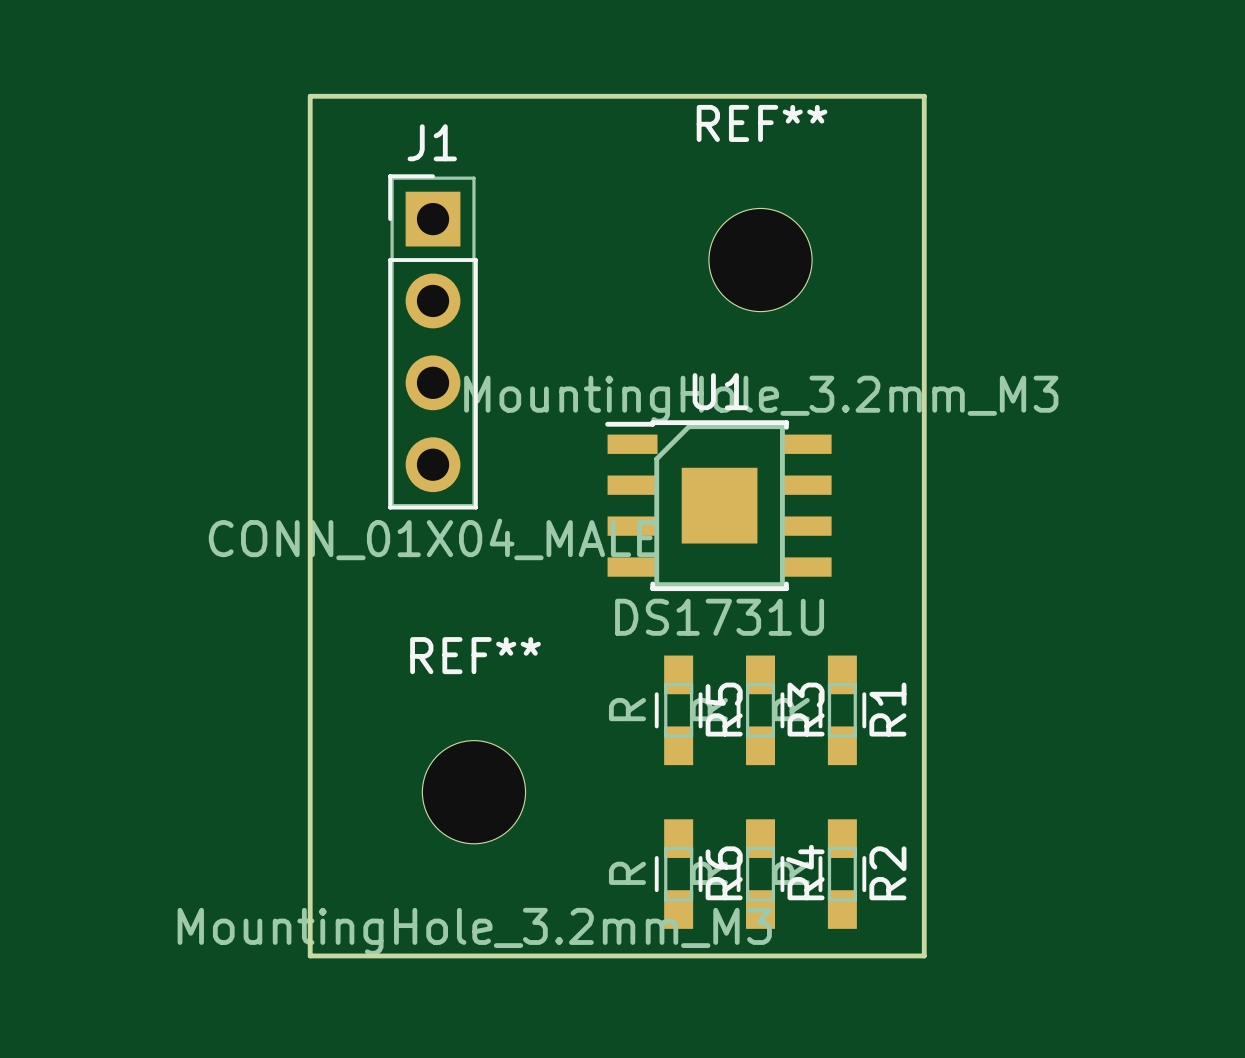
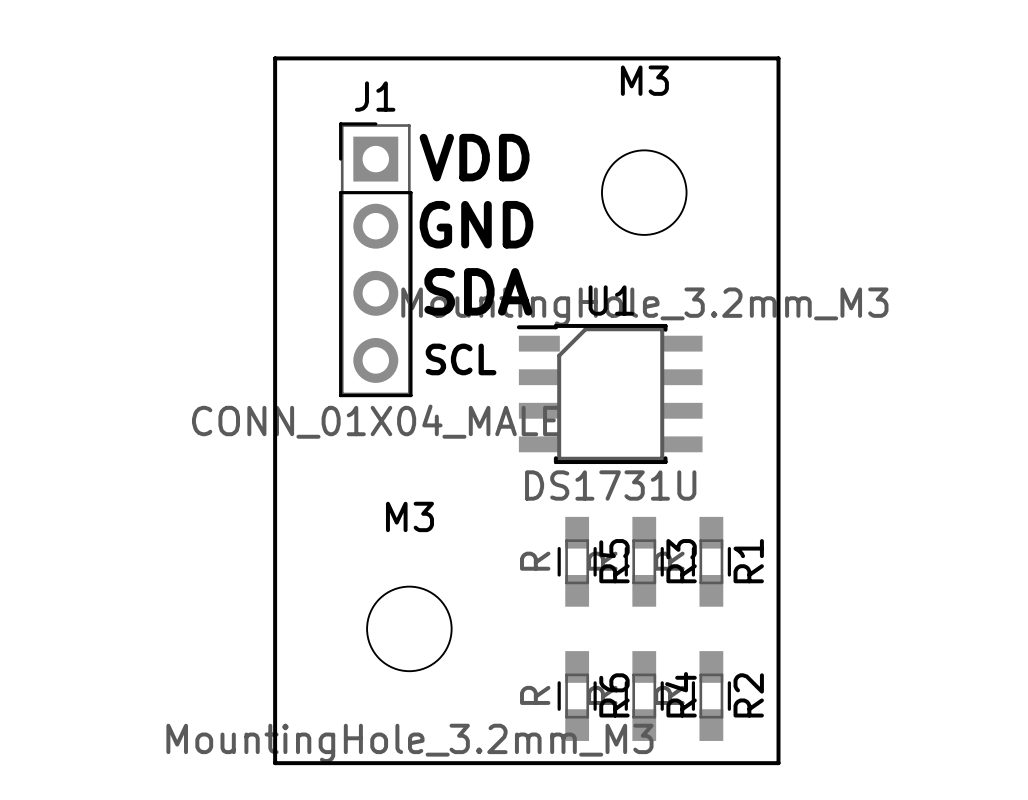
REF** name: REF** (762, 123) -> M3 (644, 80)
text: none -> VDD (474, 157)
text: none -> GND (476, 224)
text: none -> SDA (478, 291)
U1 footprint: [605, 420, 832, 592] -> [516, 323, 703, 465]
text: none -> SCL (461, 359)
REF** name: REF** (475, 655) -> M3 (409, 516)

